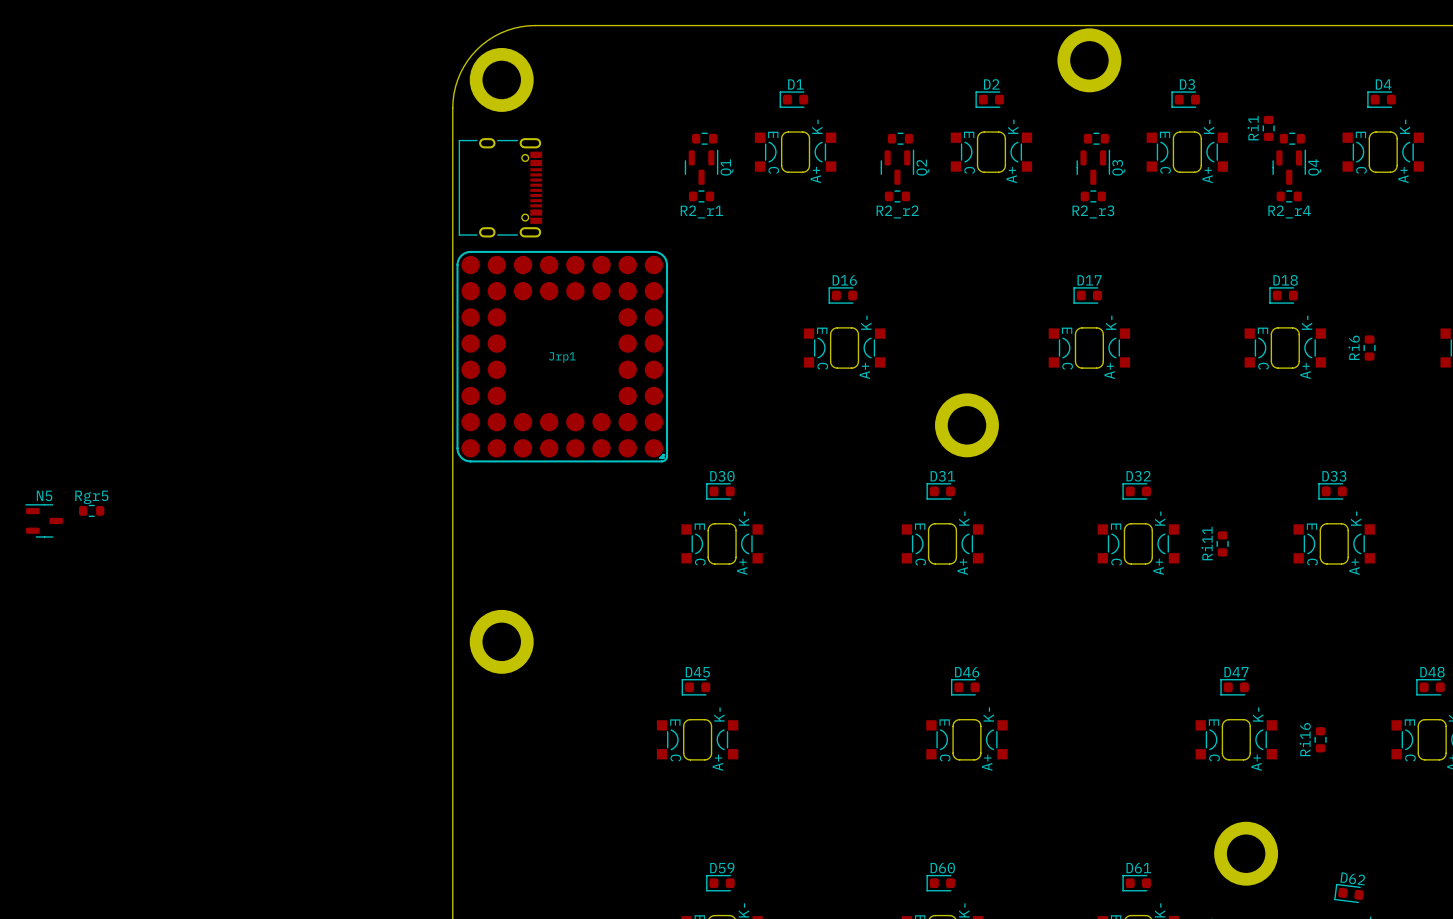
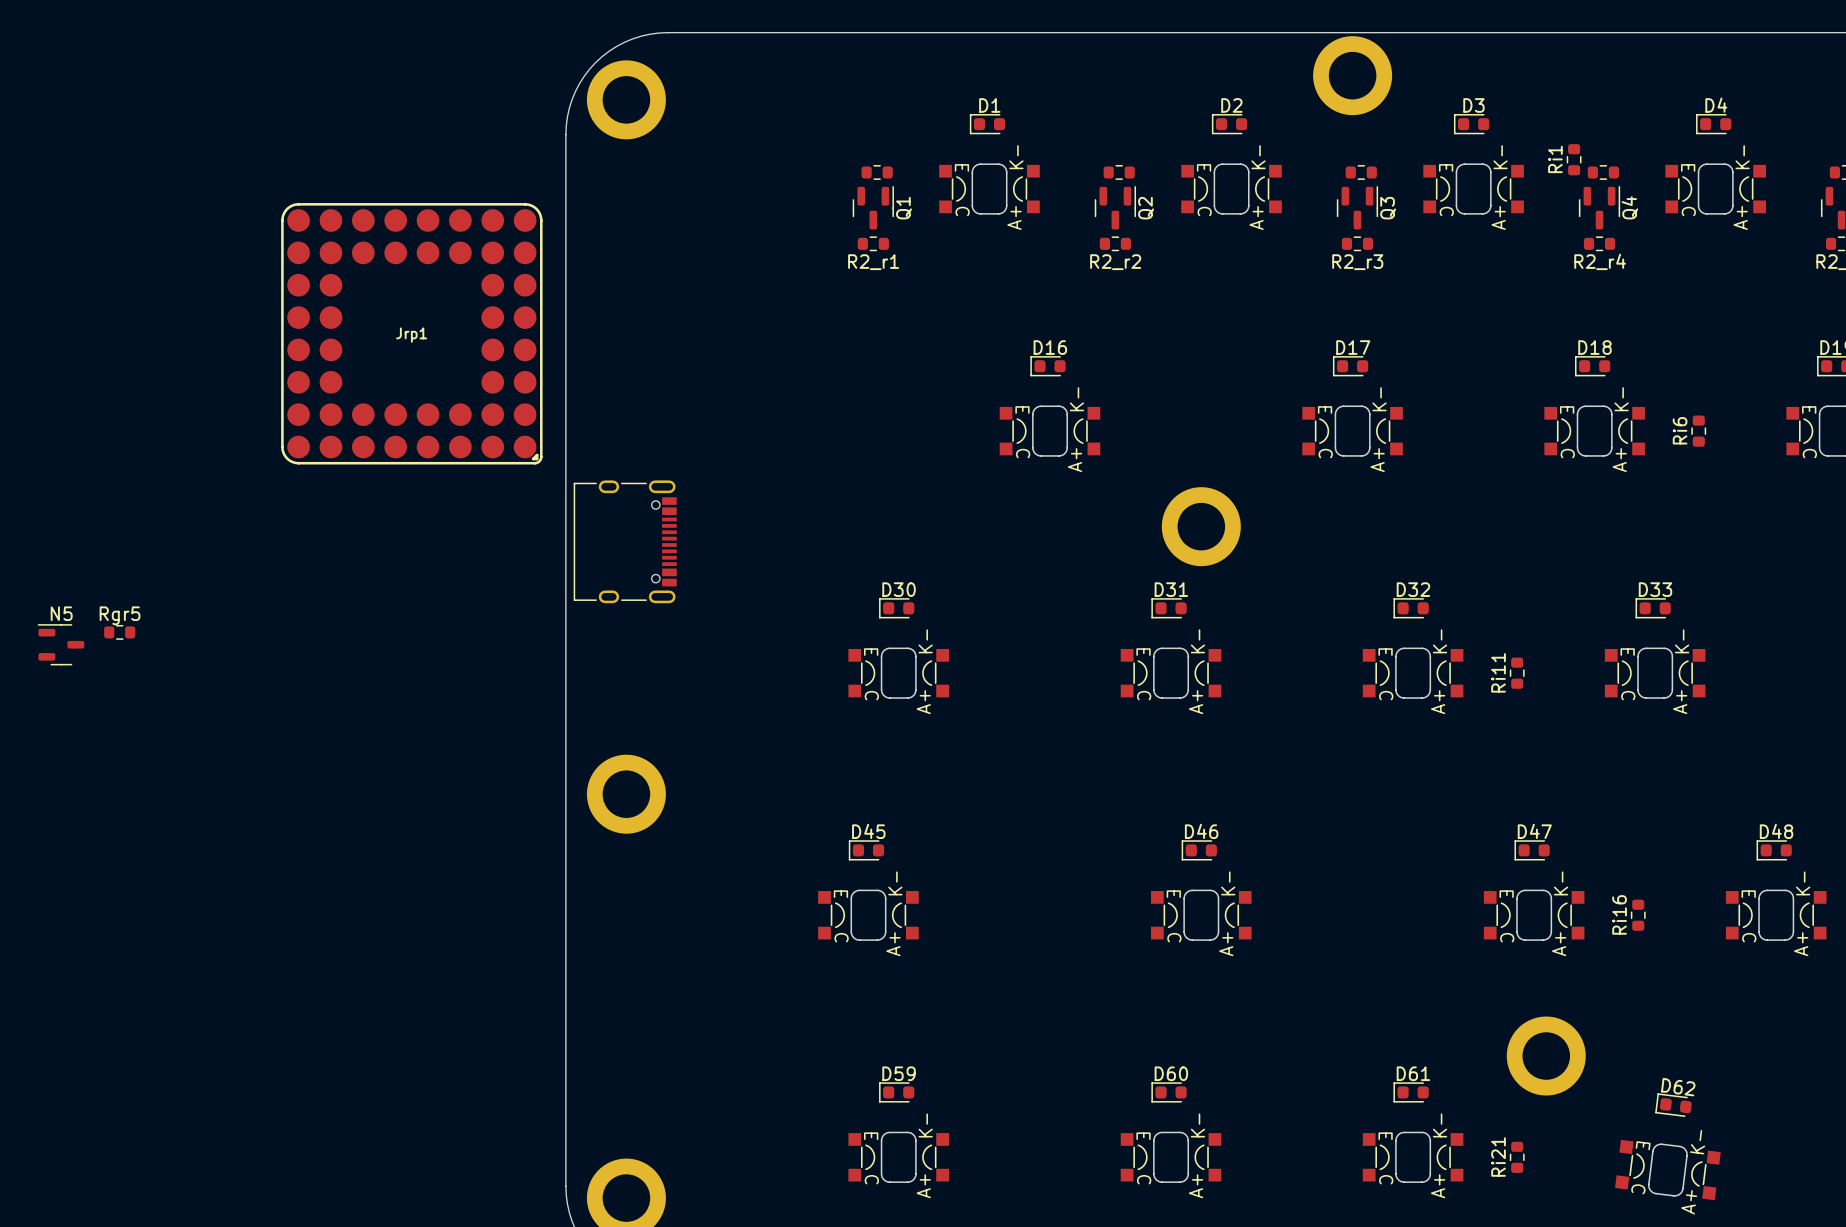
part position: (500, 187) -> (625, 541)
Jrp1 position: (562, 356) -> (411, 333)

